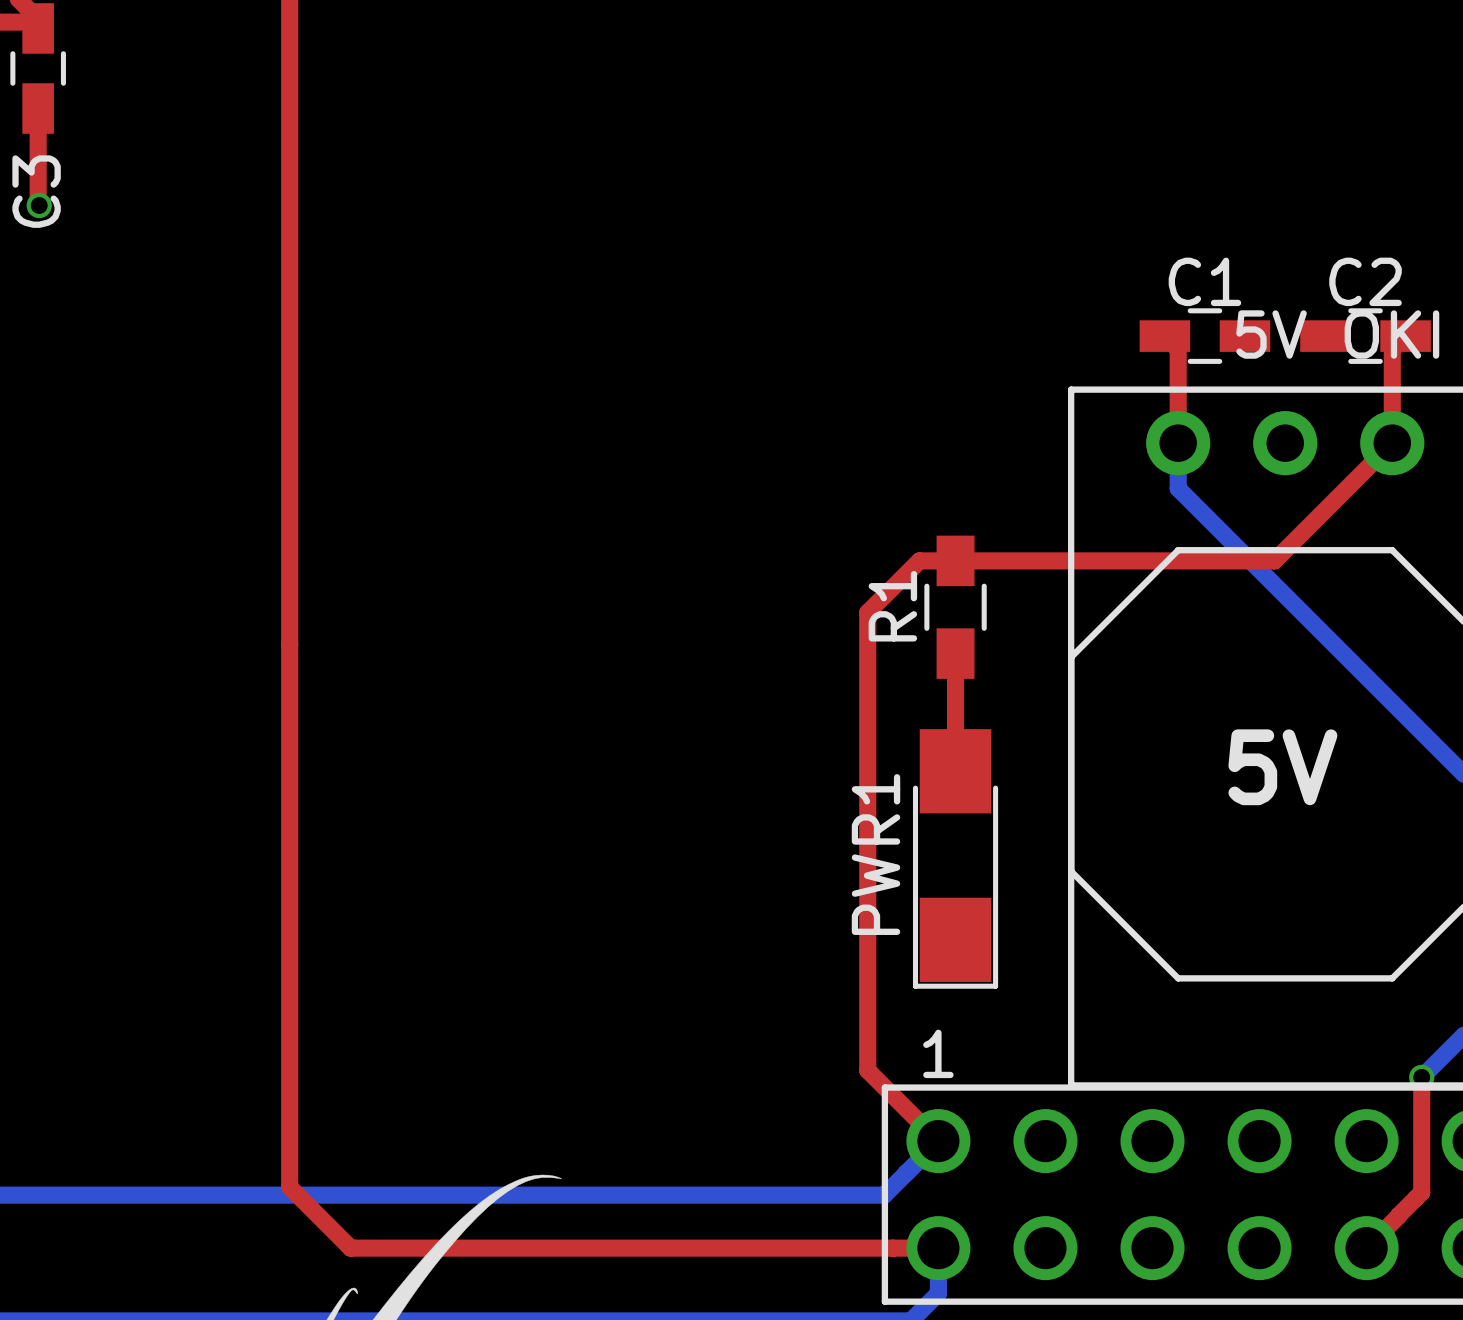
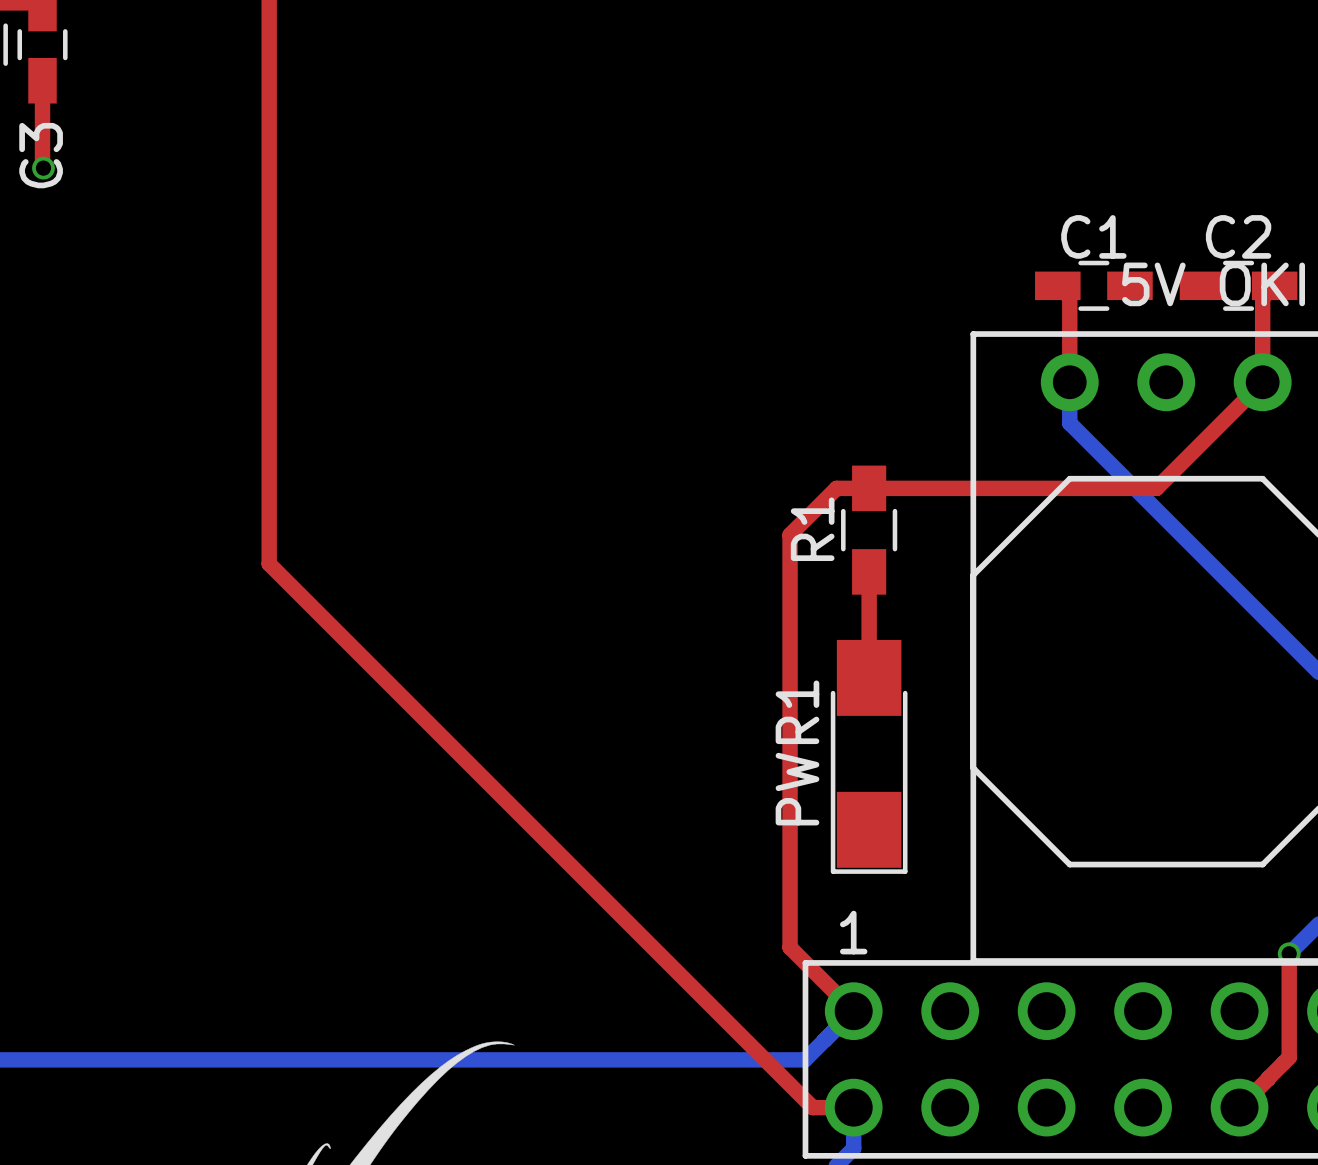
top track: (289, 644) (289, 1187) (350, 1248) (893, 1248) -> (269, 563) (812, 1107)
text: 5V (1282, 767) -> none

